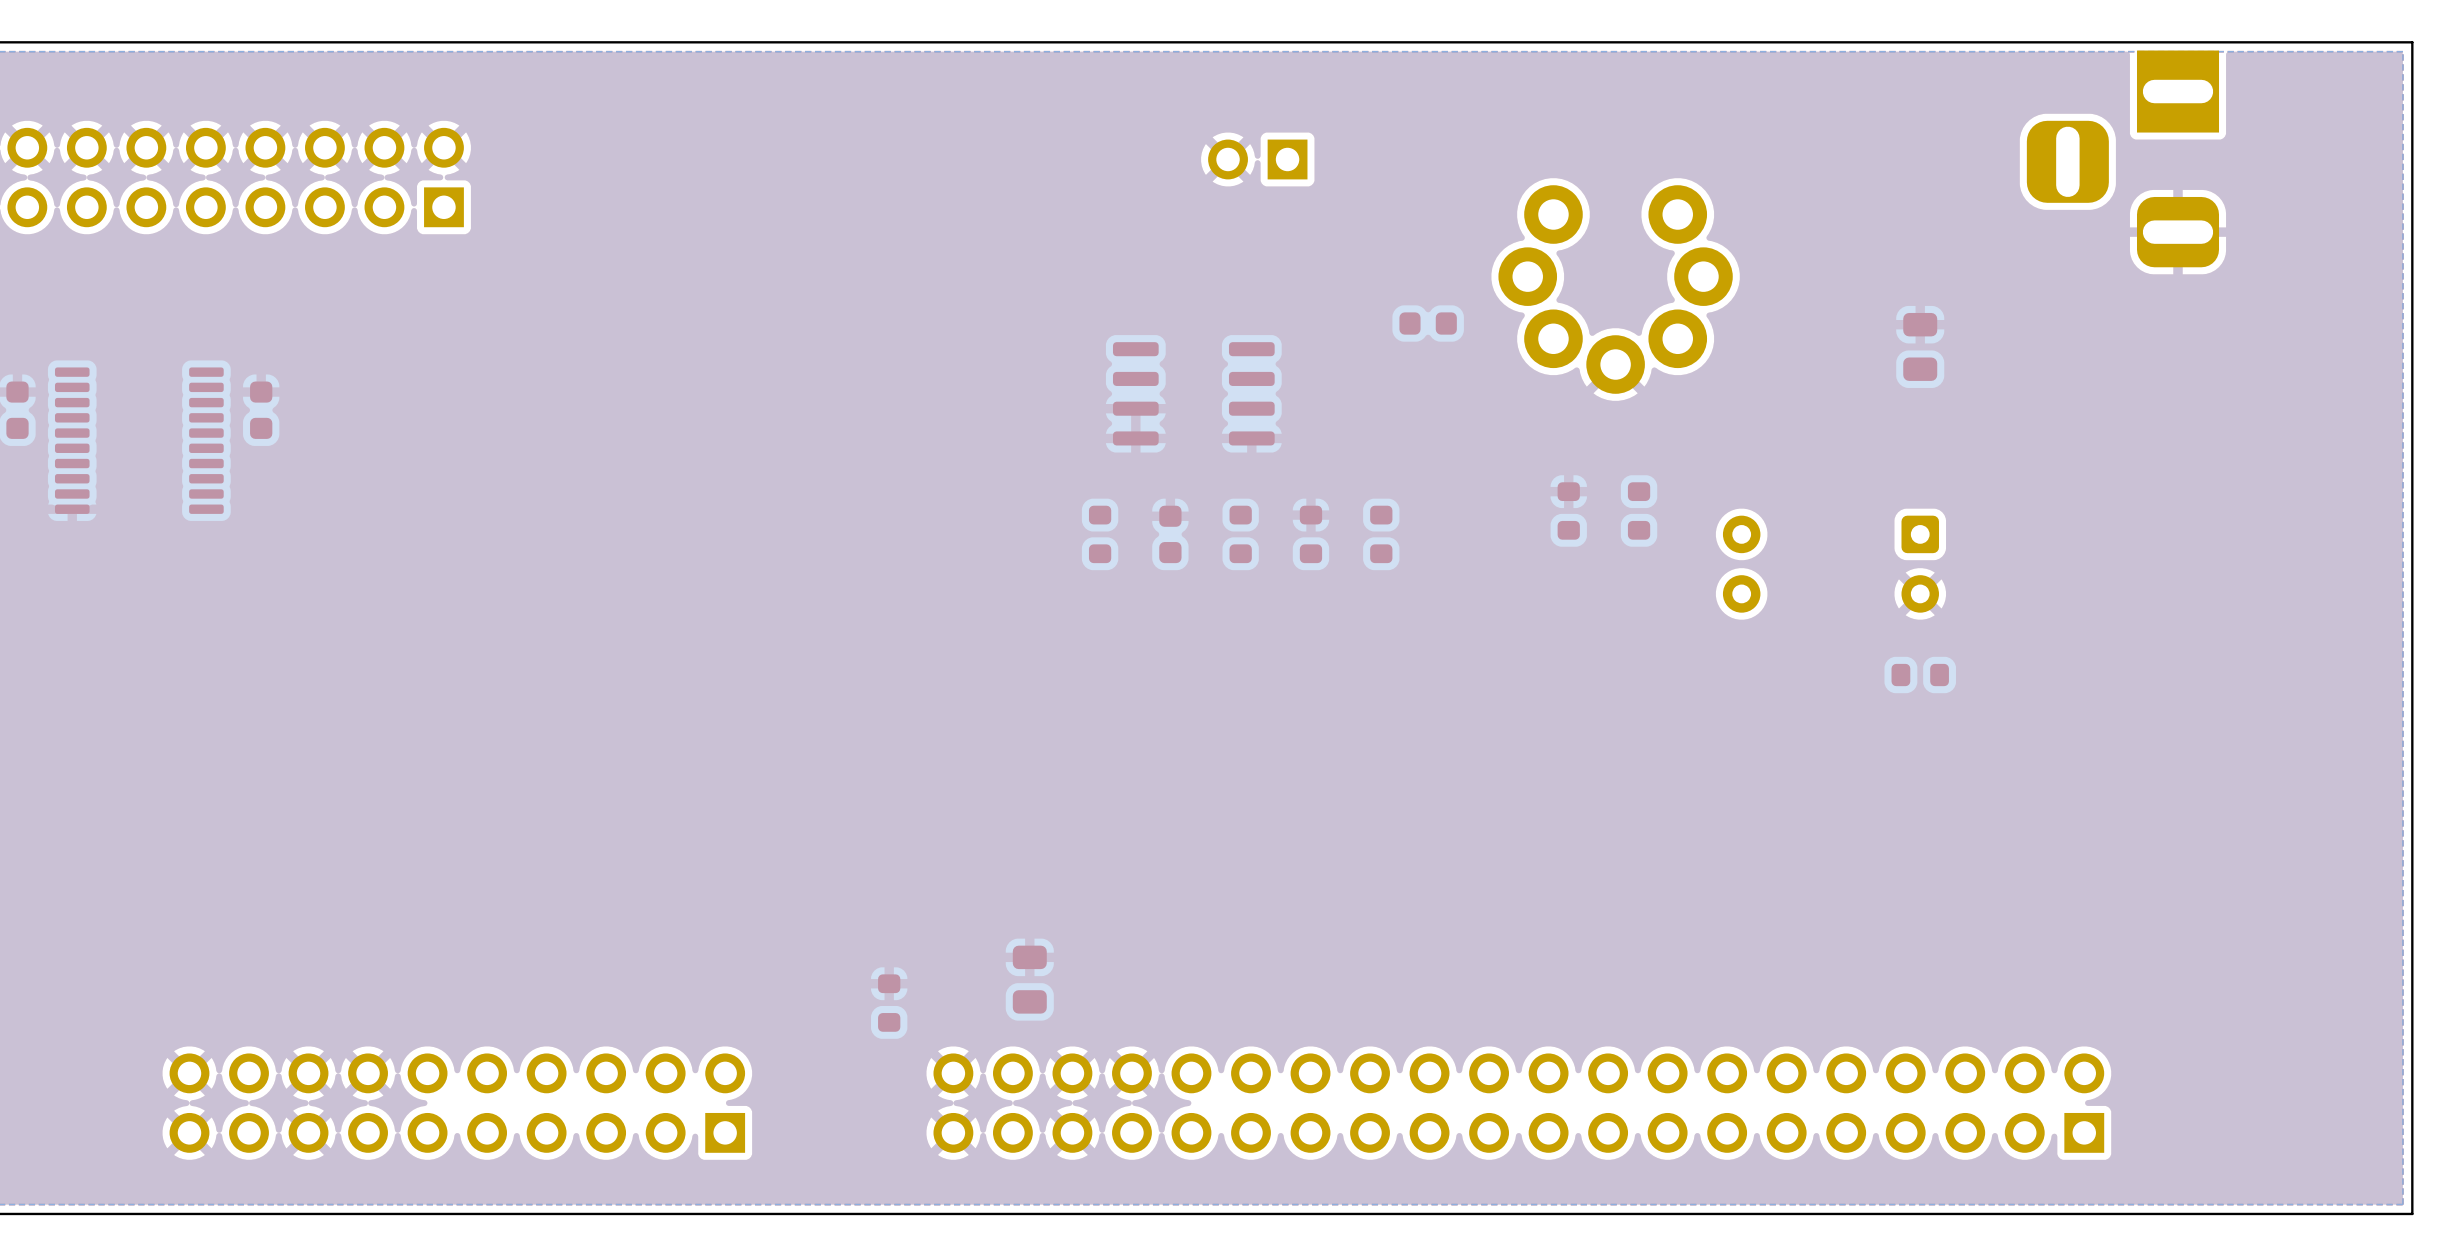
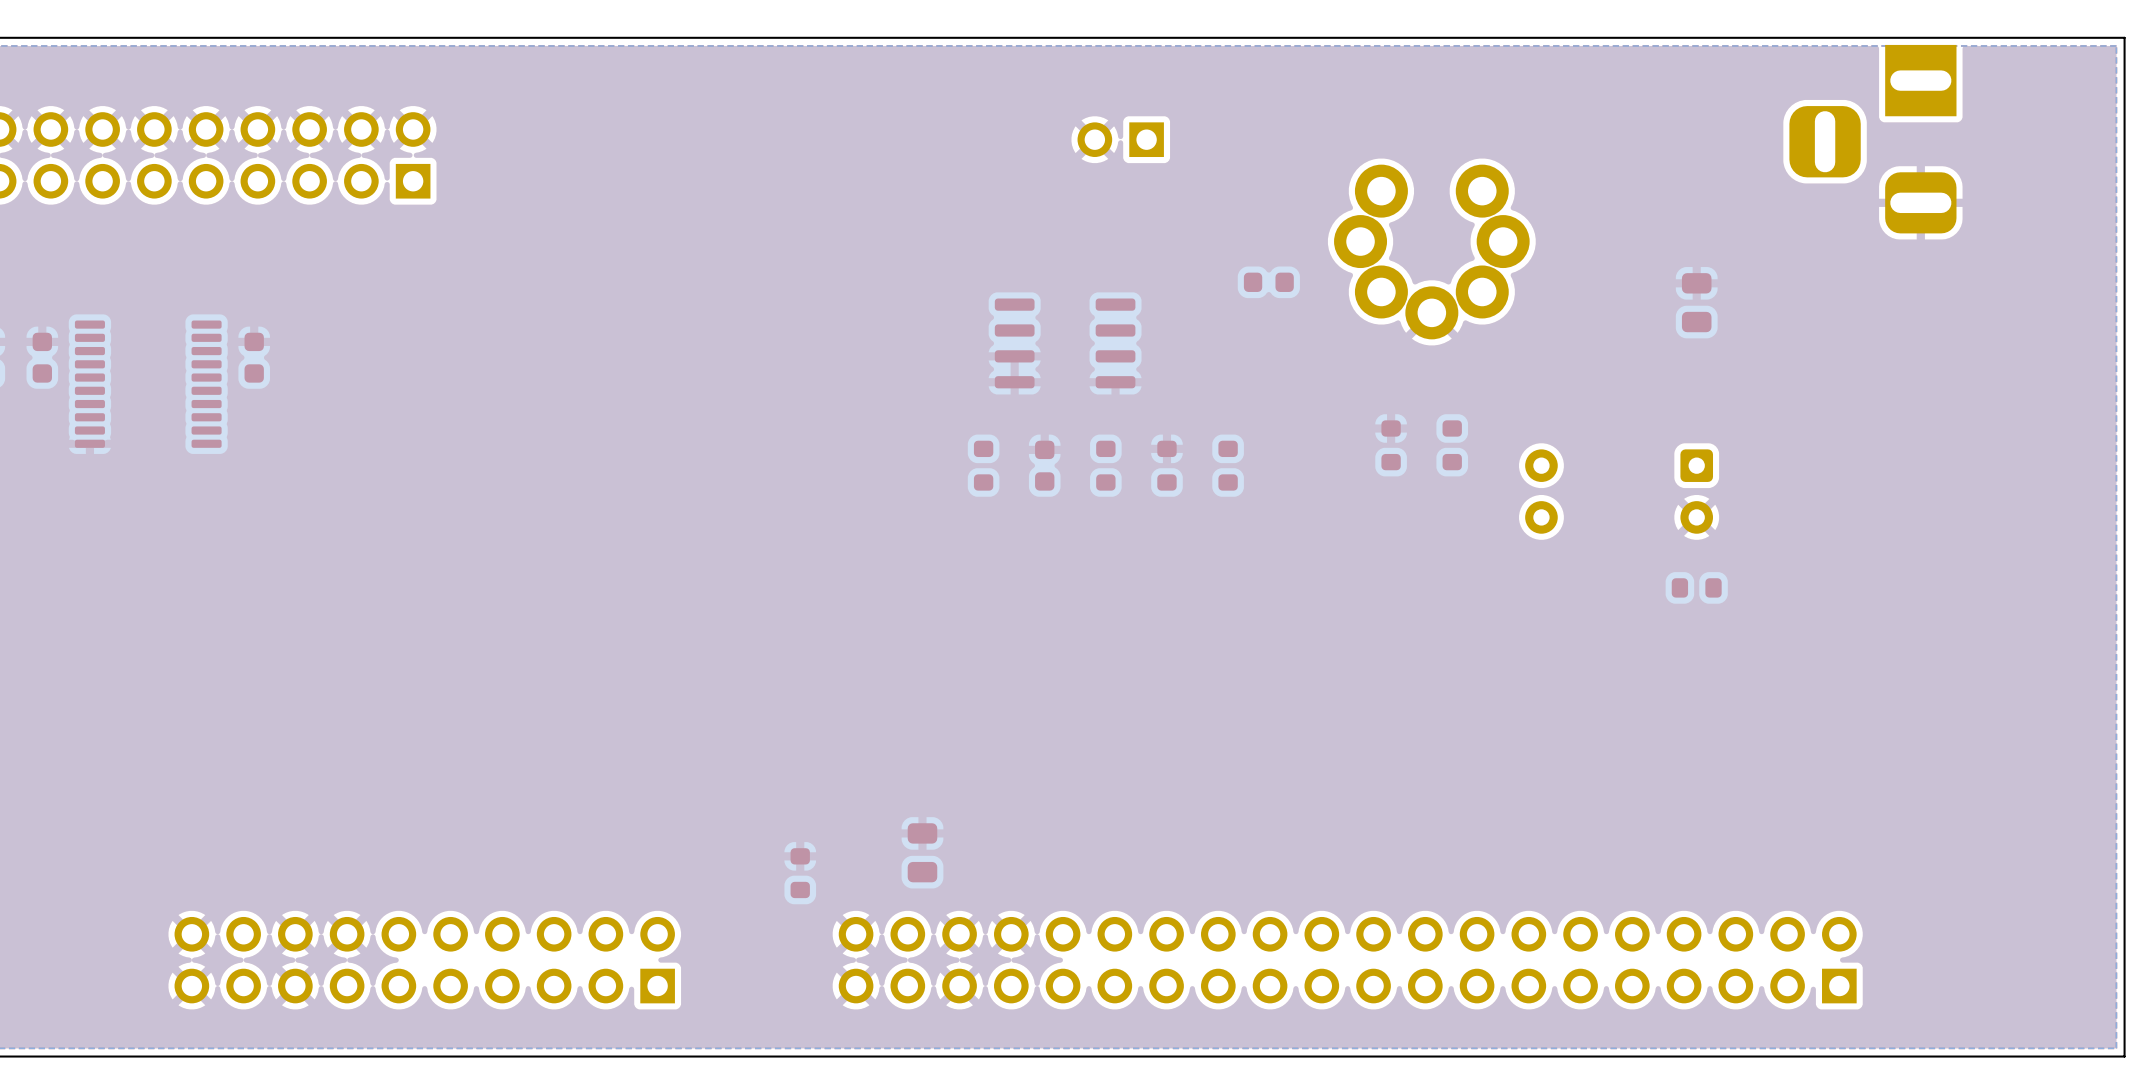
part footprint: [1498, 185, 1733, 394] -> [1334, 164, 1530, 340]

